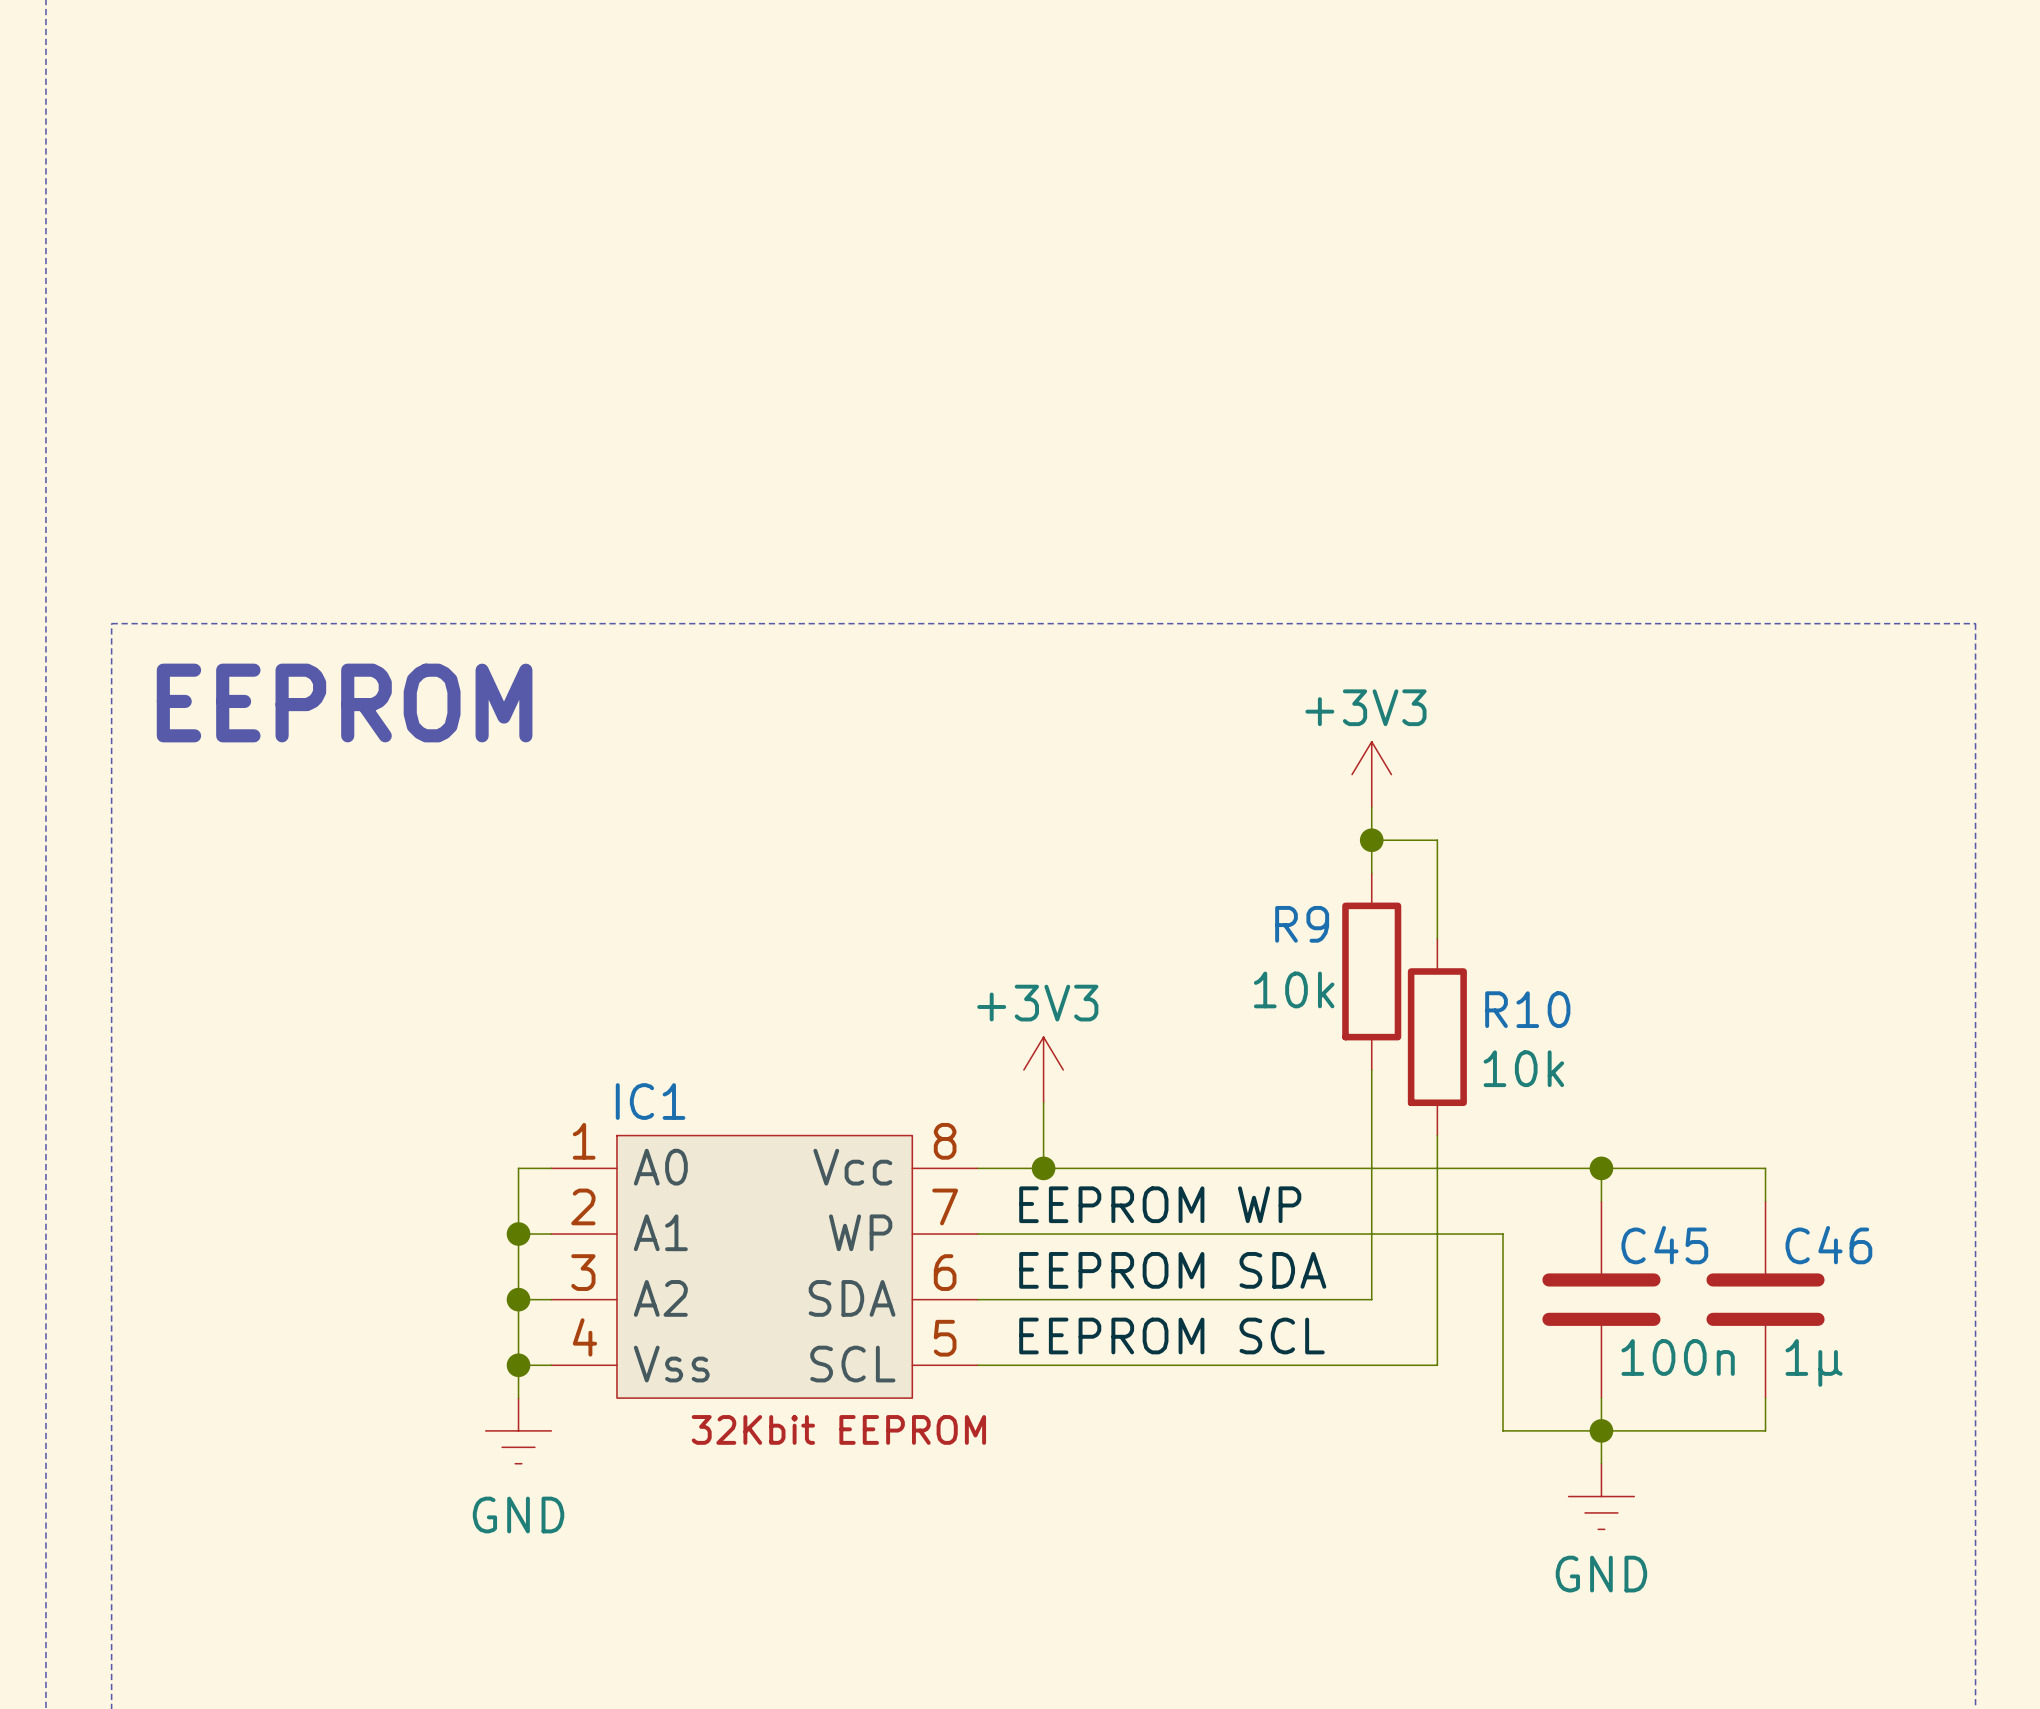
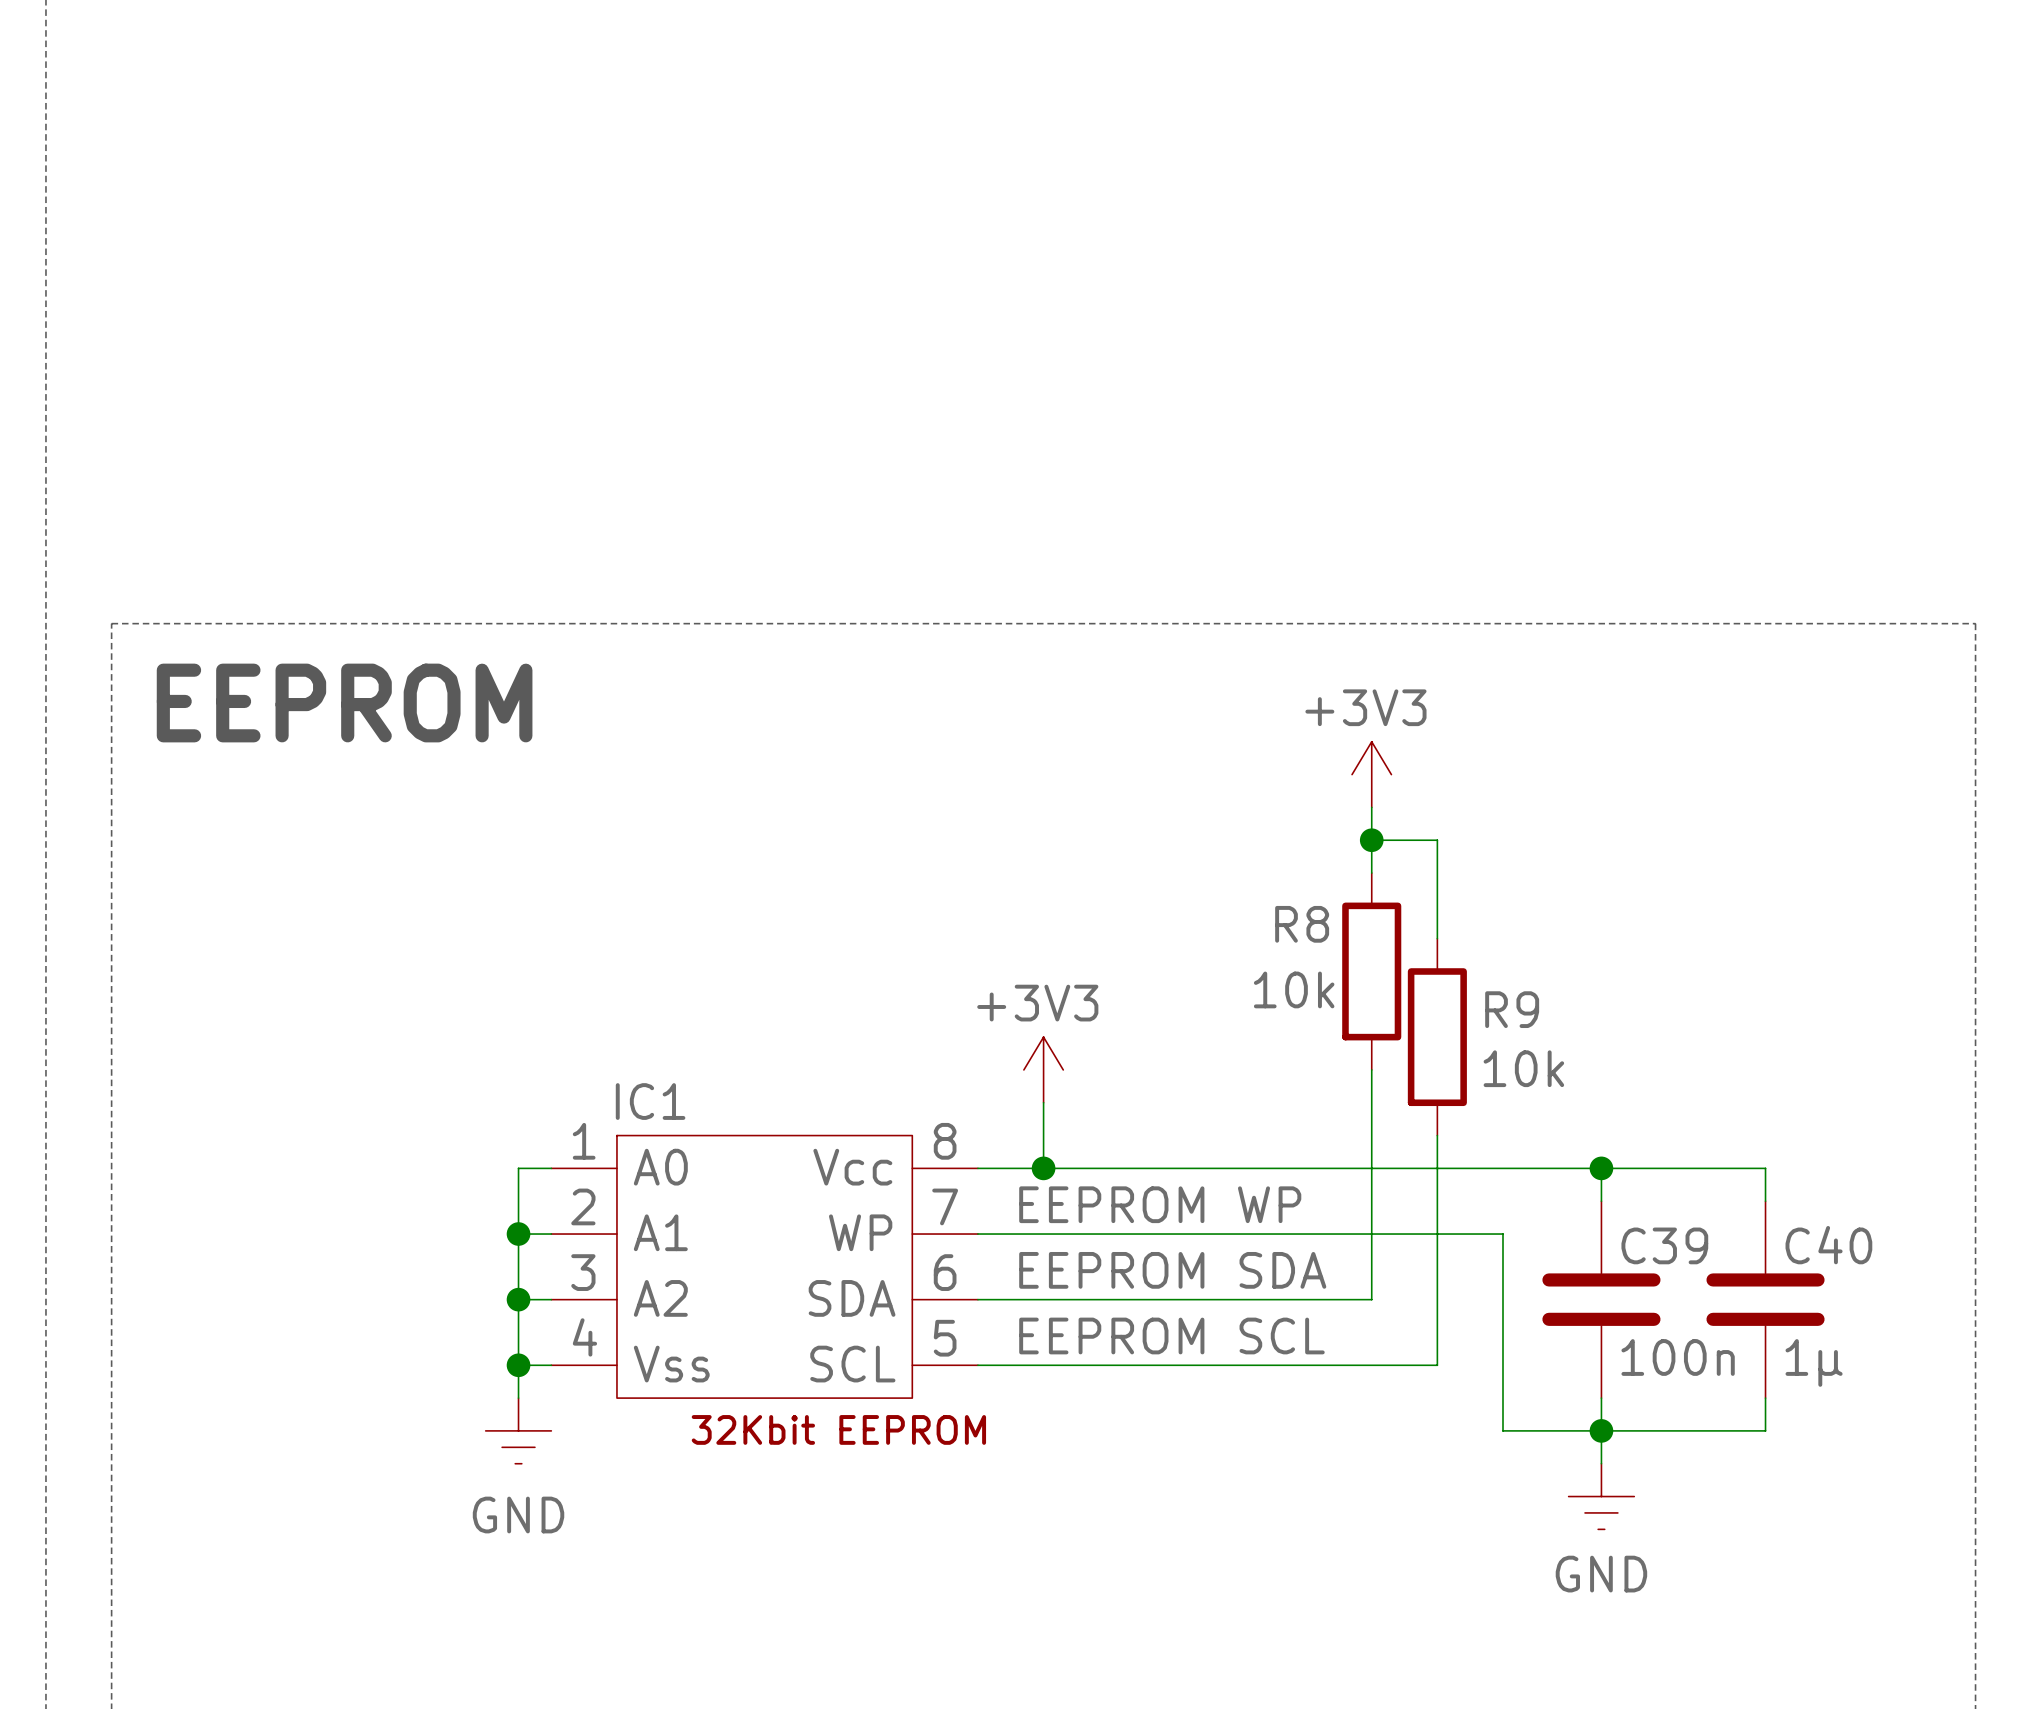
R9 name: R9 (1302, 924) -> R8 (1302, 924)
R10 name: R10 (1527, 1009) -> R9 (1512, 1009)
C45 name: C45 (1664, 1245) -> C39 (1664, 1245)
C46 name: C46 (1828, 1245) -> C40 (1828, 1245)

